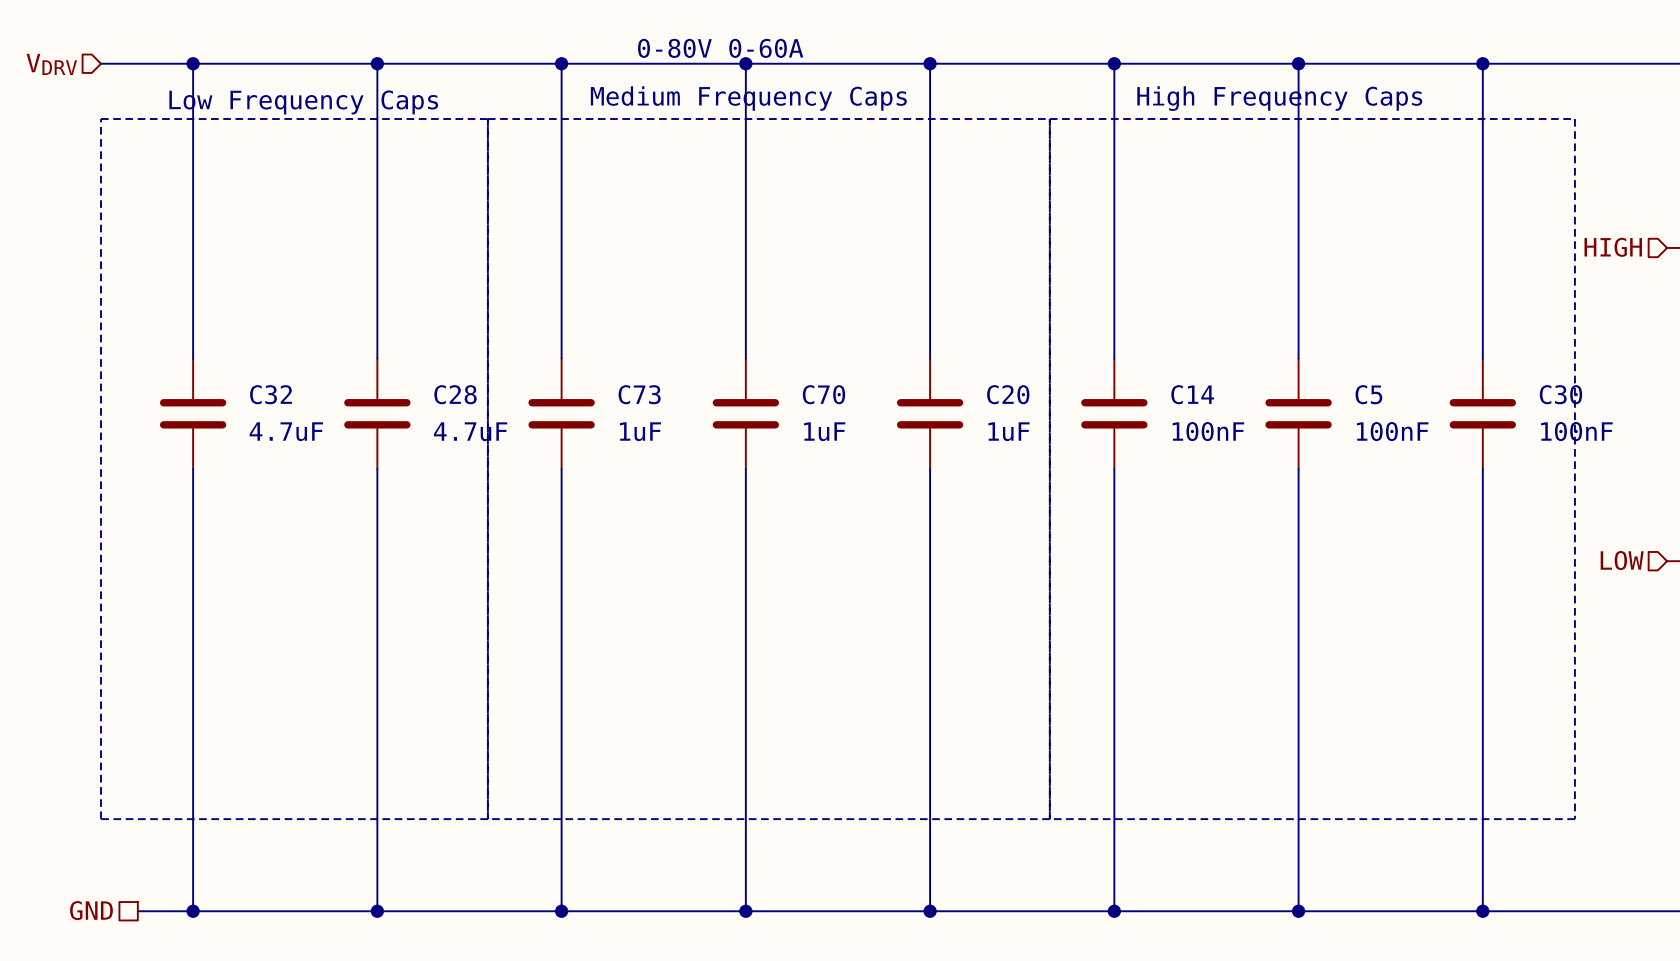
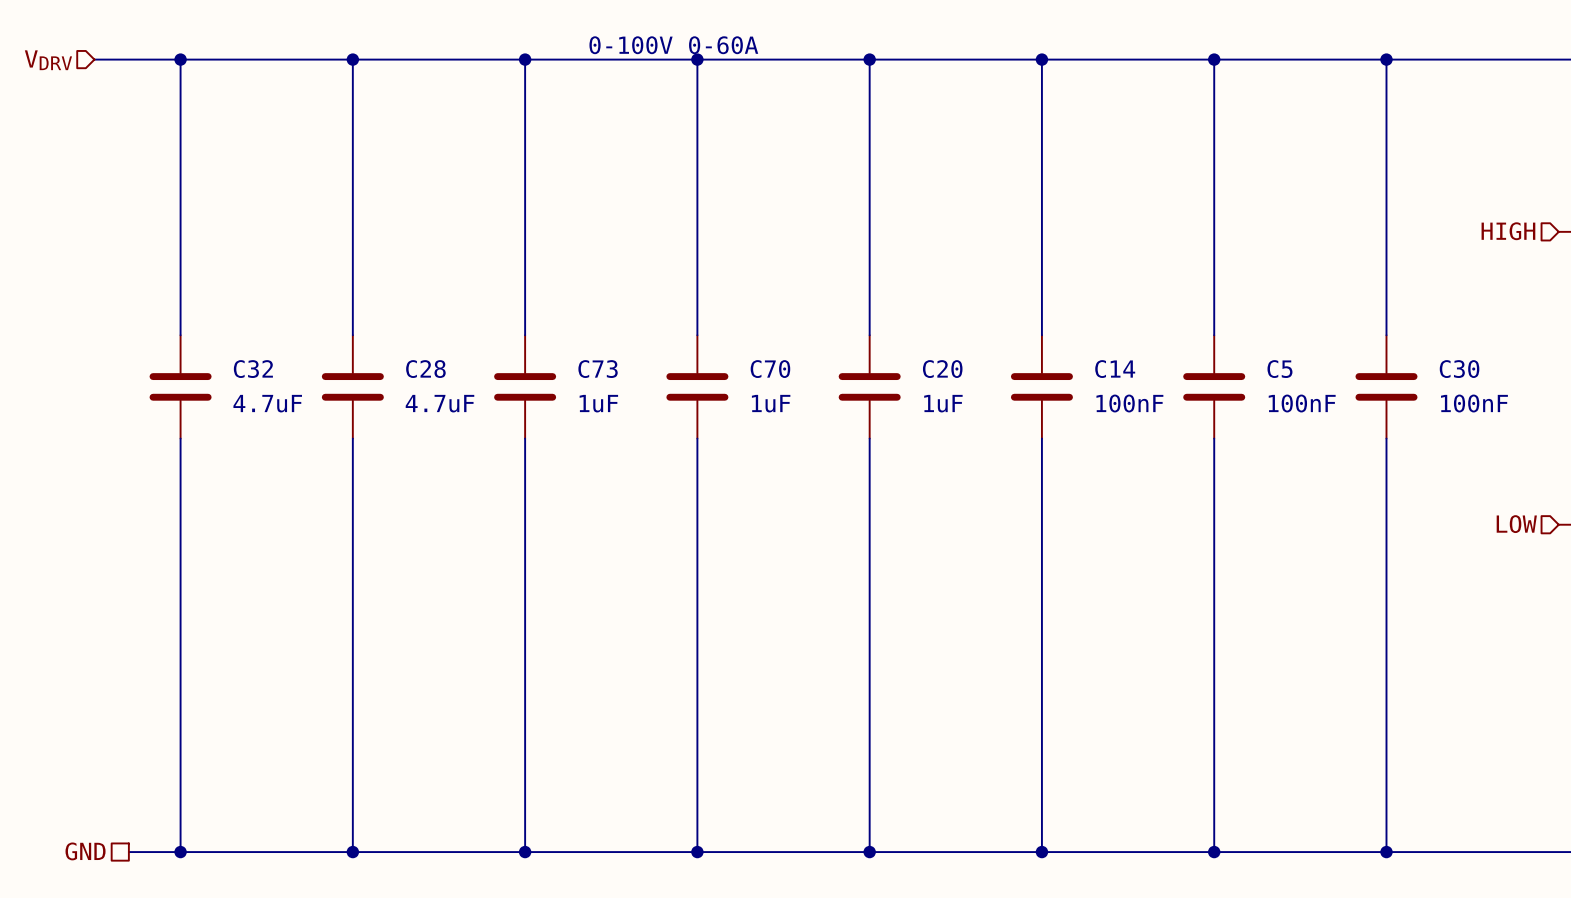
text: 0-80V 0-60A (720, 48) -> 0-100V 0-60A (673, 45)
text: Medium Frequency Caps (748, 98) -> none
text: High Frequency Caps (1279, 98) -> none
text: Low Frequency Caps (303, 102) -> none
line: (101, 119) (1574, 119) (1574, 819) (101, 819) (101, 119) -> none
line: (487, 119) (487, 819) -> none
line: (1049, 119) (1049, 819) -> none

